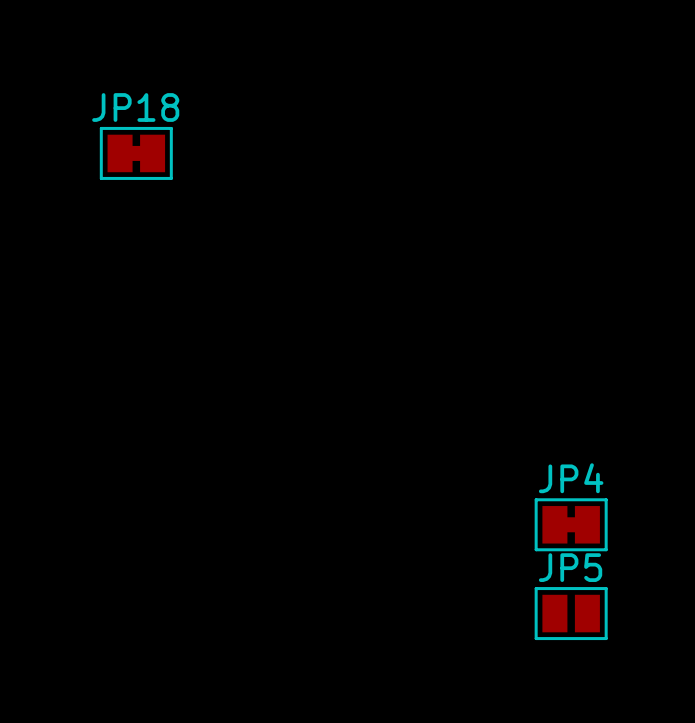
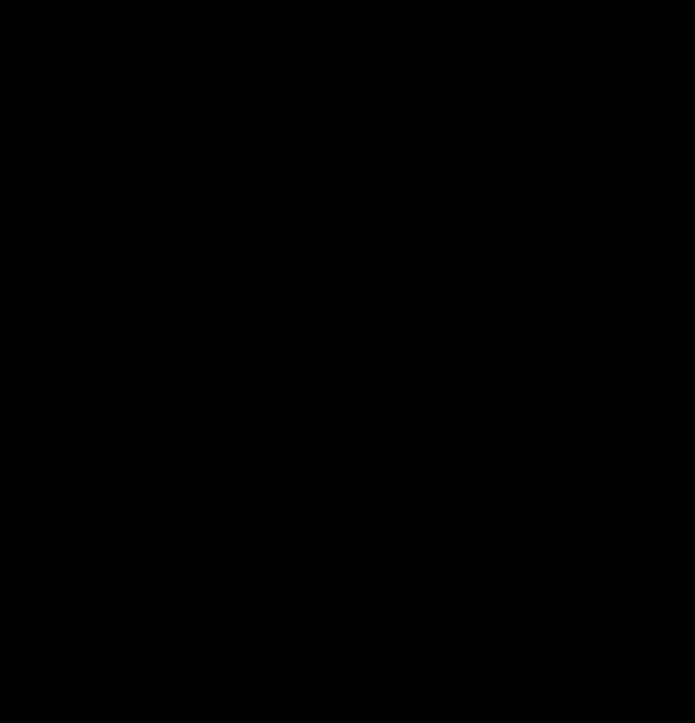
JP18: (136, 153) -> none
JP4: (571, 524) -> none
JP5: (571, 613) -> none

